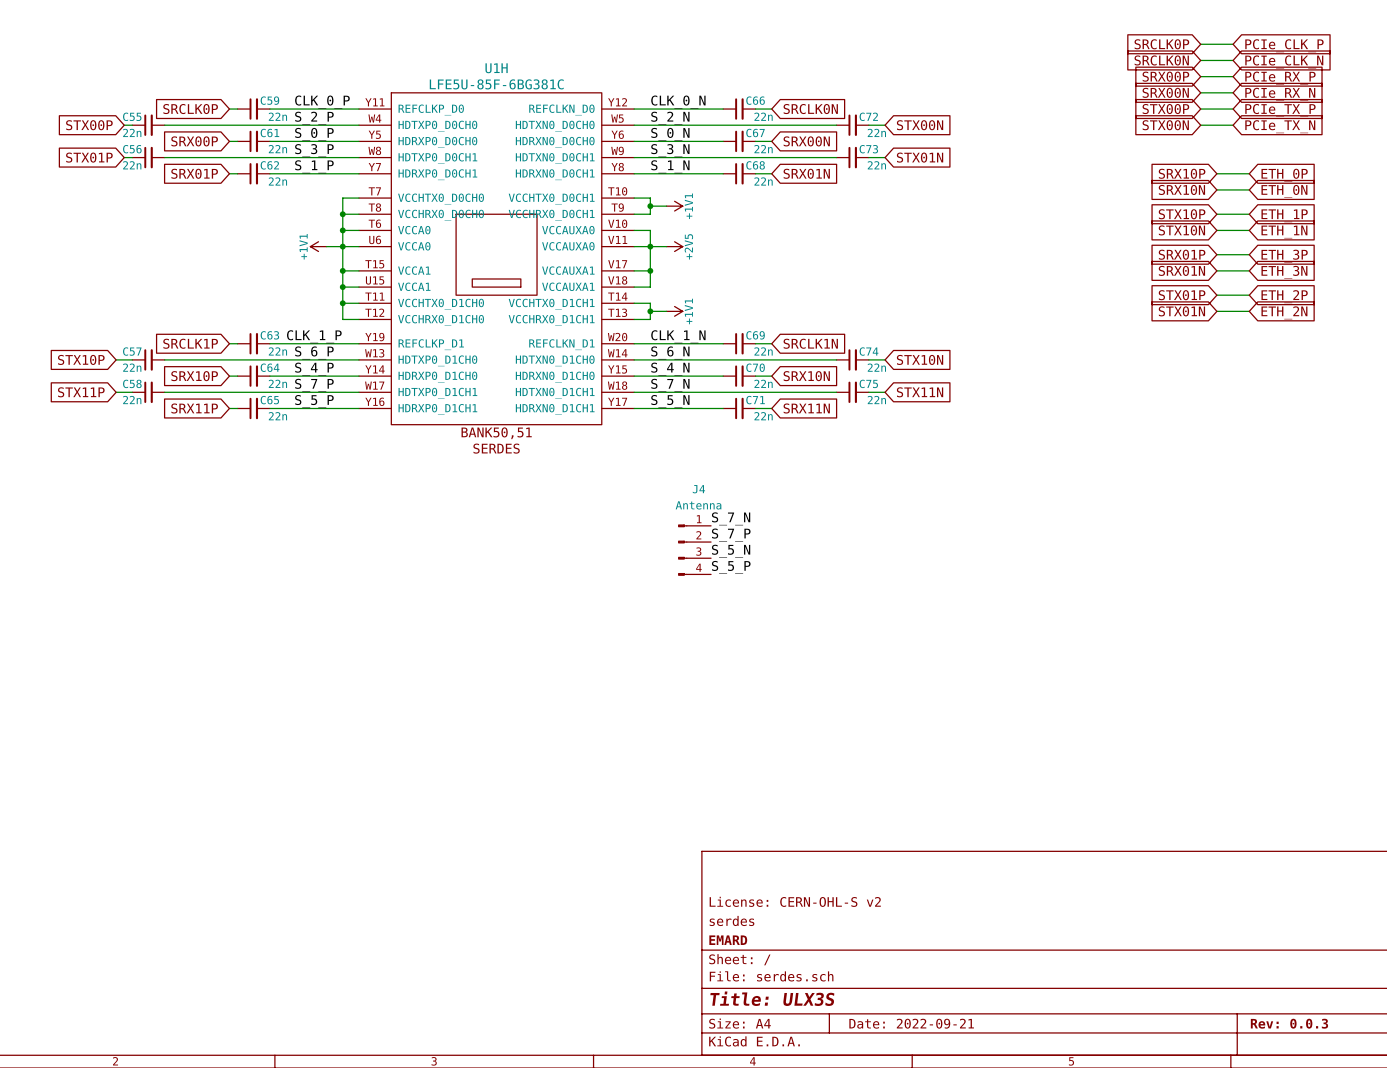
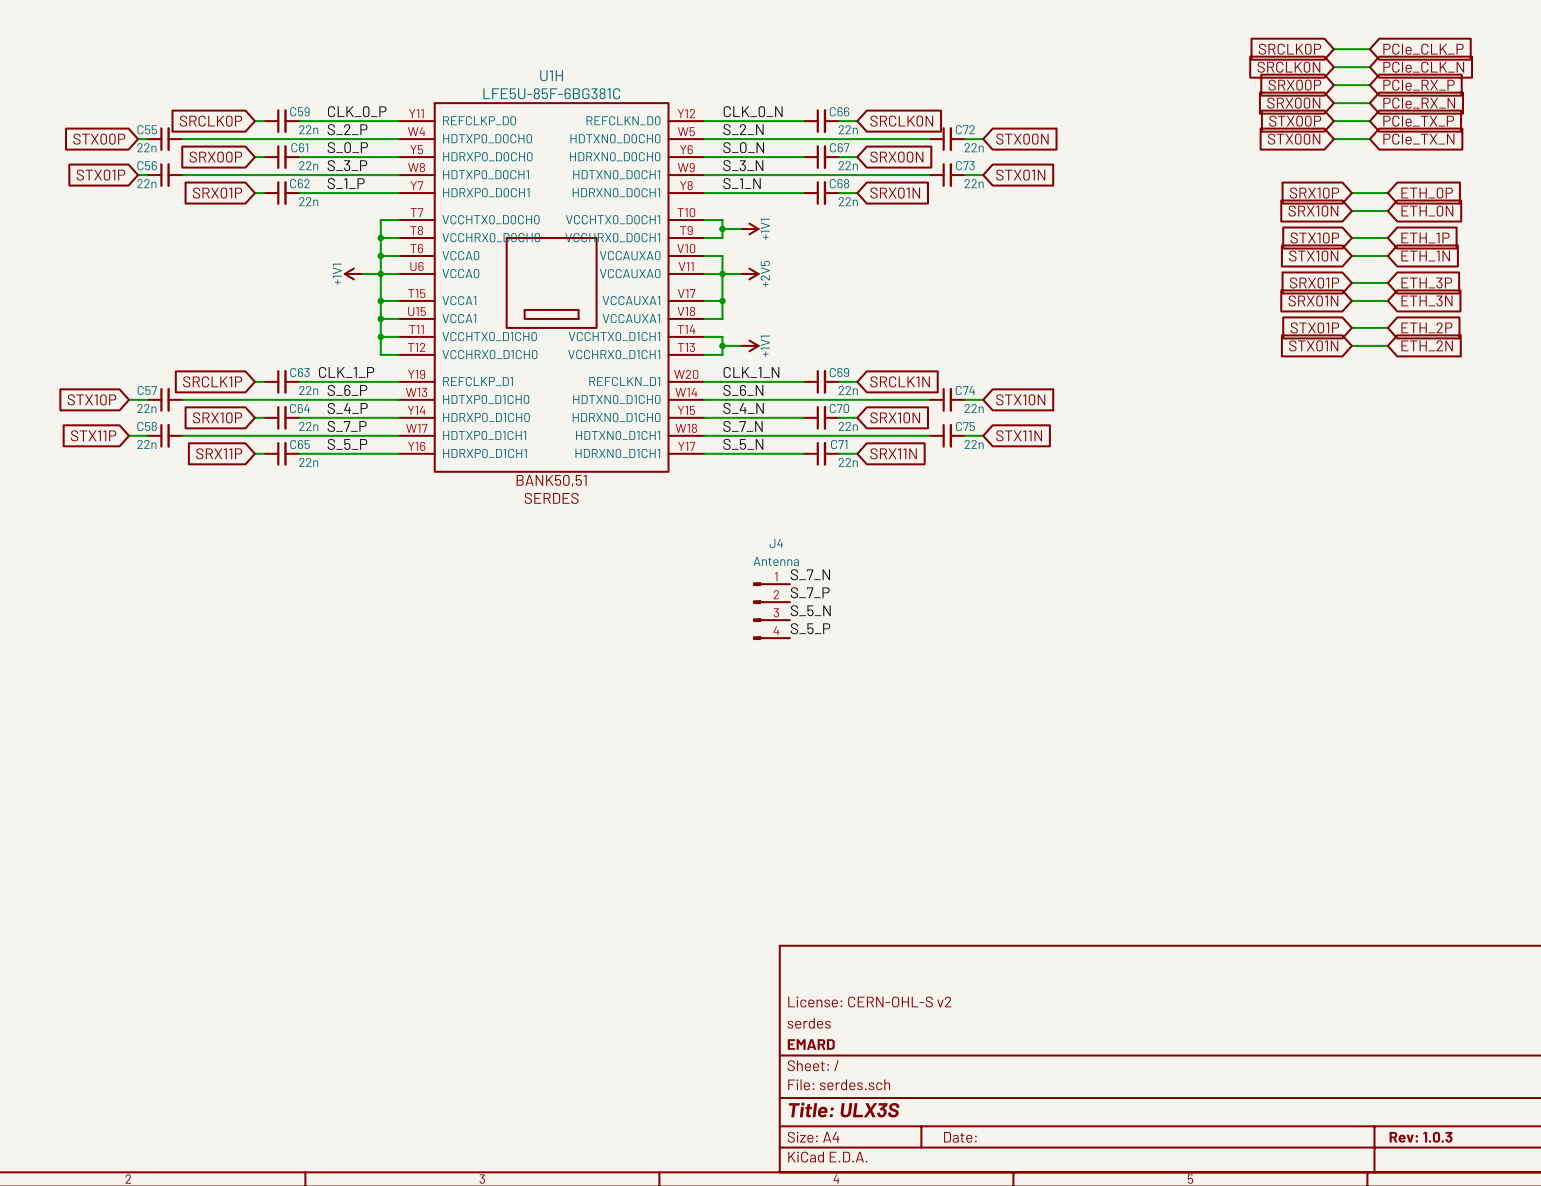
title block: Date: 2022-09-21 (911, 1023) -> Date: (960, 1137)
title block: Rev: 0.0.3 (1289, 1023) -> Rev: 1.0.3 (1421, 1137)

